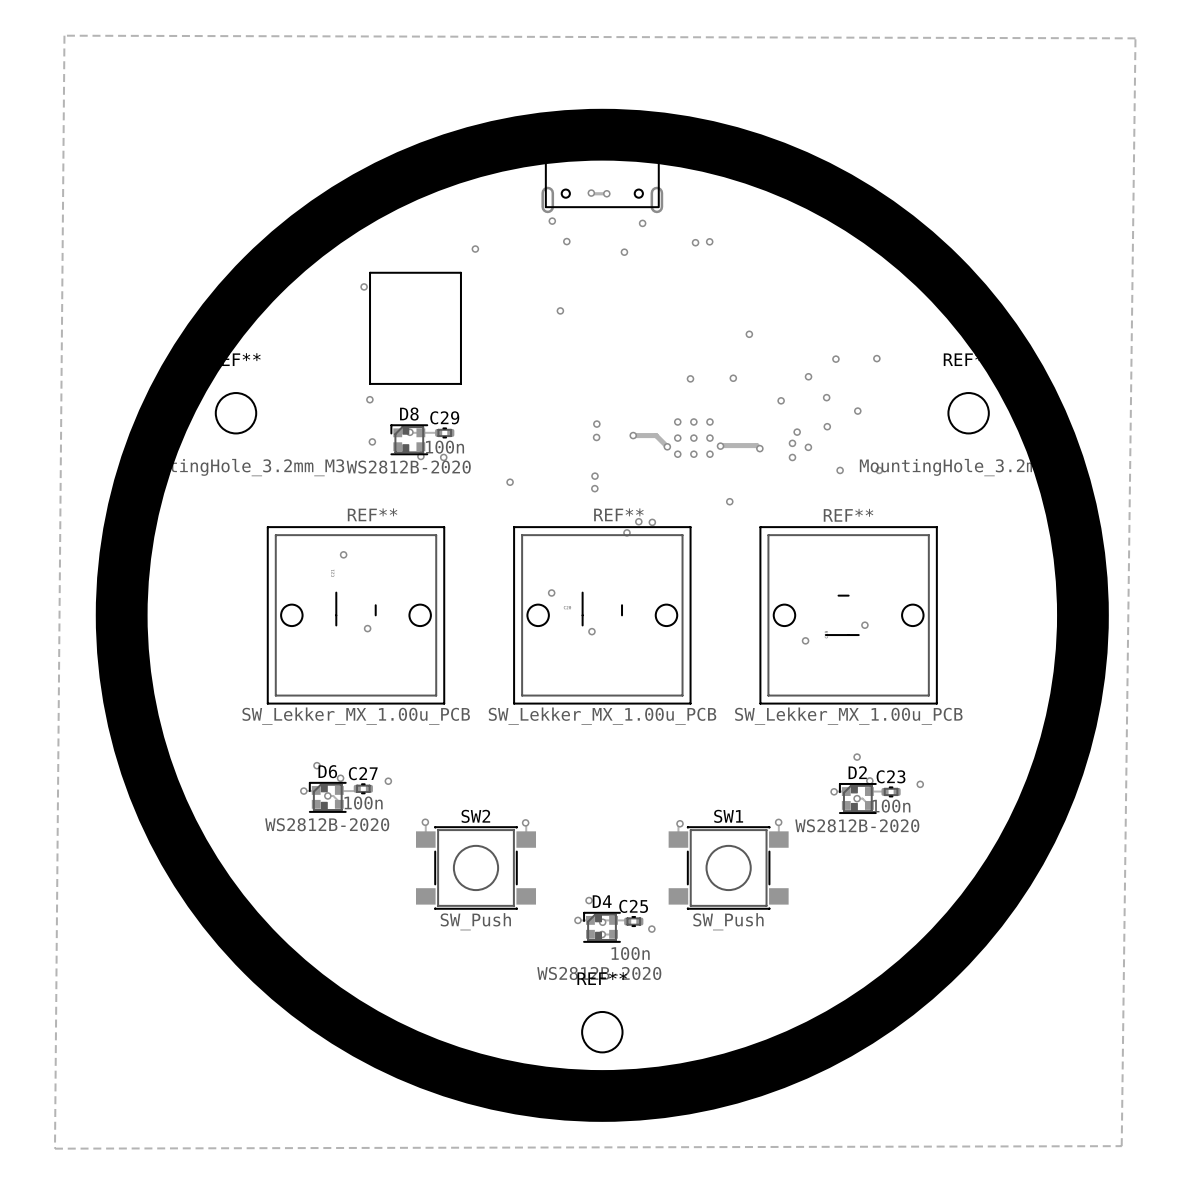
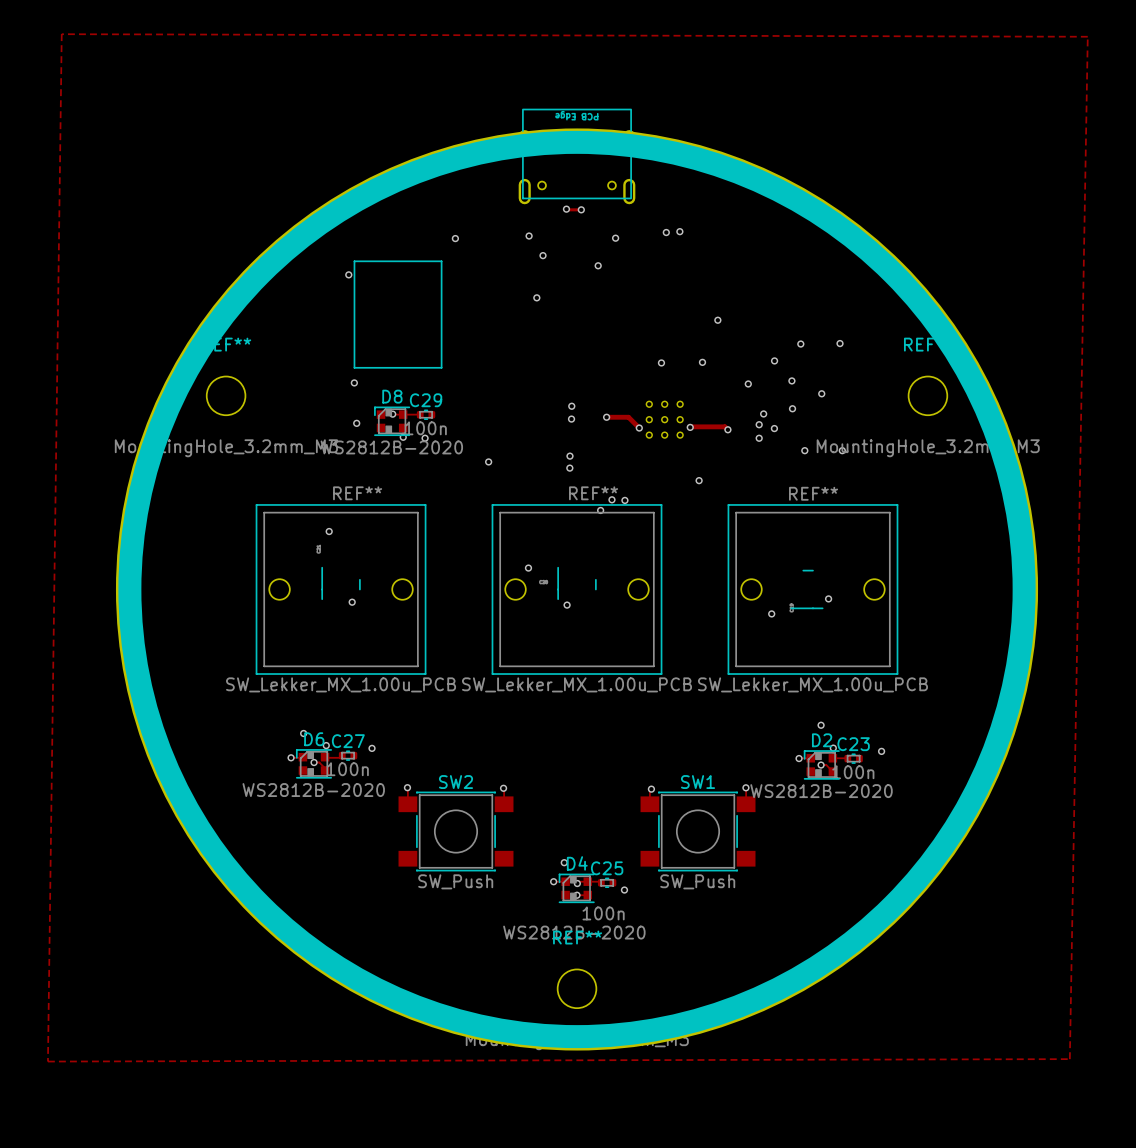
zone outline: (64, 35) (54, 1148) (1121, 1146) (1135, 38) -> (61, 34) (47, 1061) (1069, 1059) (1087, 36)
round board edge size: [95, 108, 1109, 1122] -> [115, 128, 1039, 1051]
drawing shape: [97, 110, 1108, 1121] -> [117, 129, 1037, 1050]
via: (591, 193) -> none
track: (606, 193) (590, 194) -> (581, 209) (565, 210)
via: (606, 193) -> none
via: none -> (566, 209)
via: none -> (581, 209)
via: (552, 221) -> none
via: (642, 223) -> none
via: (566, 241) -> none
via: none -> (529, 236)
via: none -> (615, 238)
via: (624, 252) -> none
via: none -> (543, 255)
via: none -> (598, 265)

